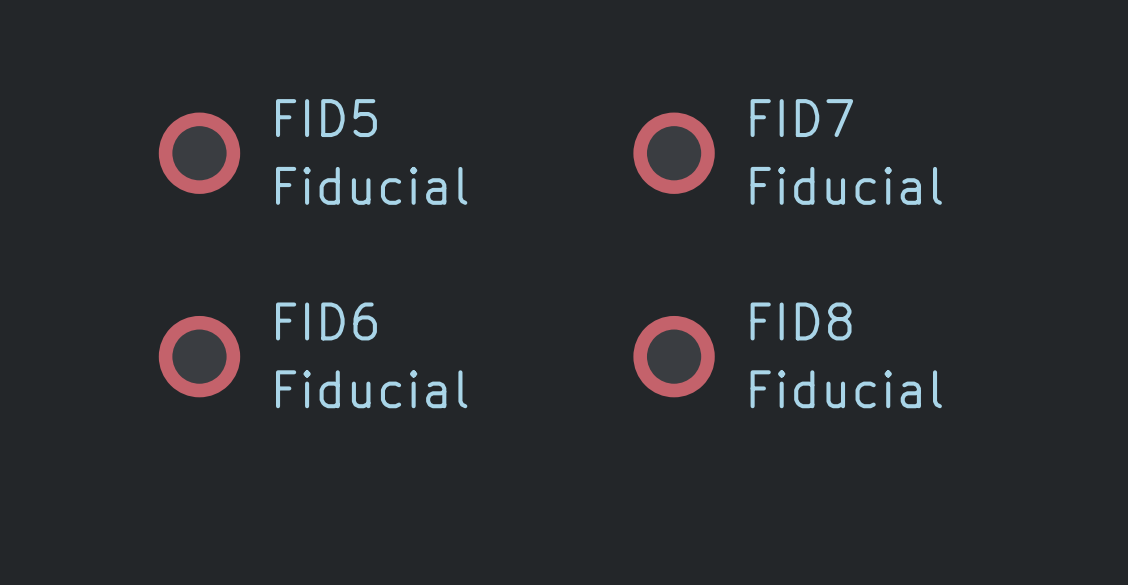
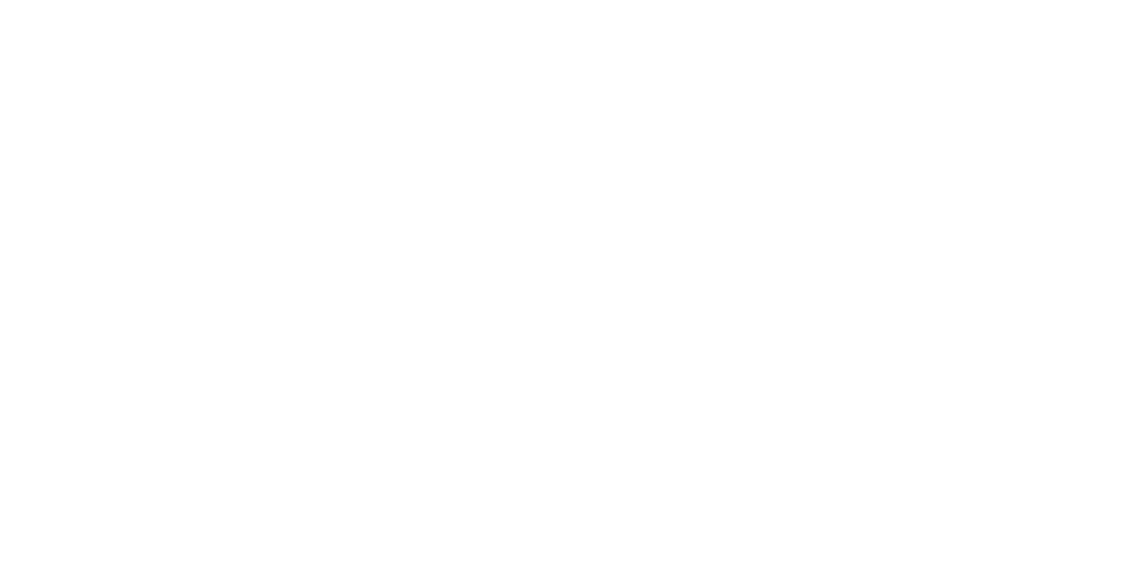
FID5: Fiducial (199, 153) -> none
FID7: Fiducial (674, 153) -> none
FID6: Fiducial (199, 356) -> none
FID8: Fiducial (674, 356) -> none

